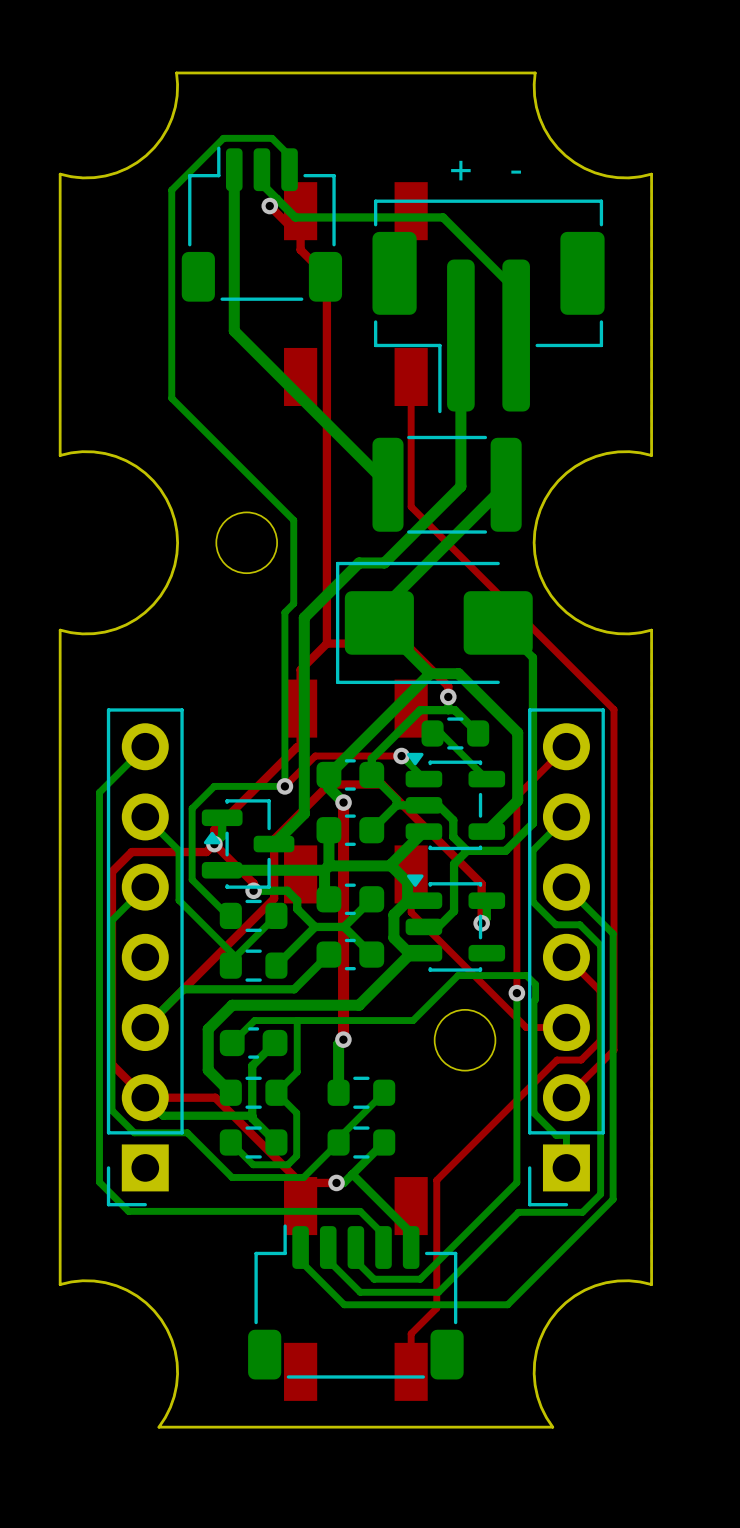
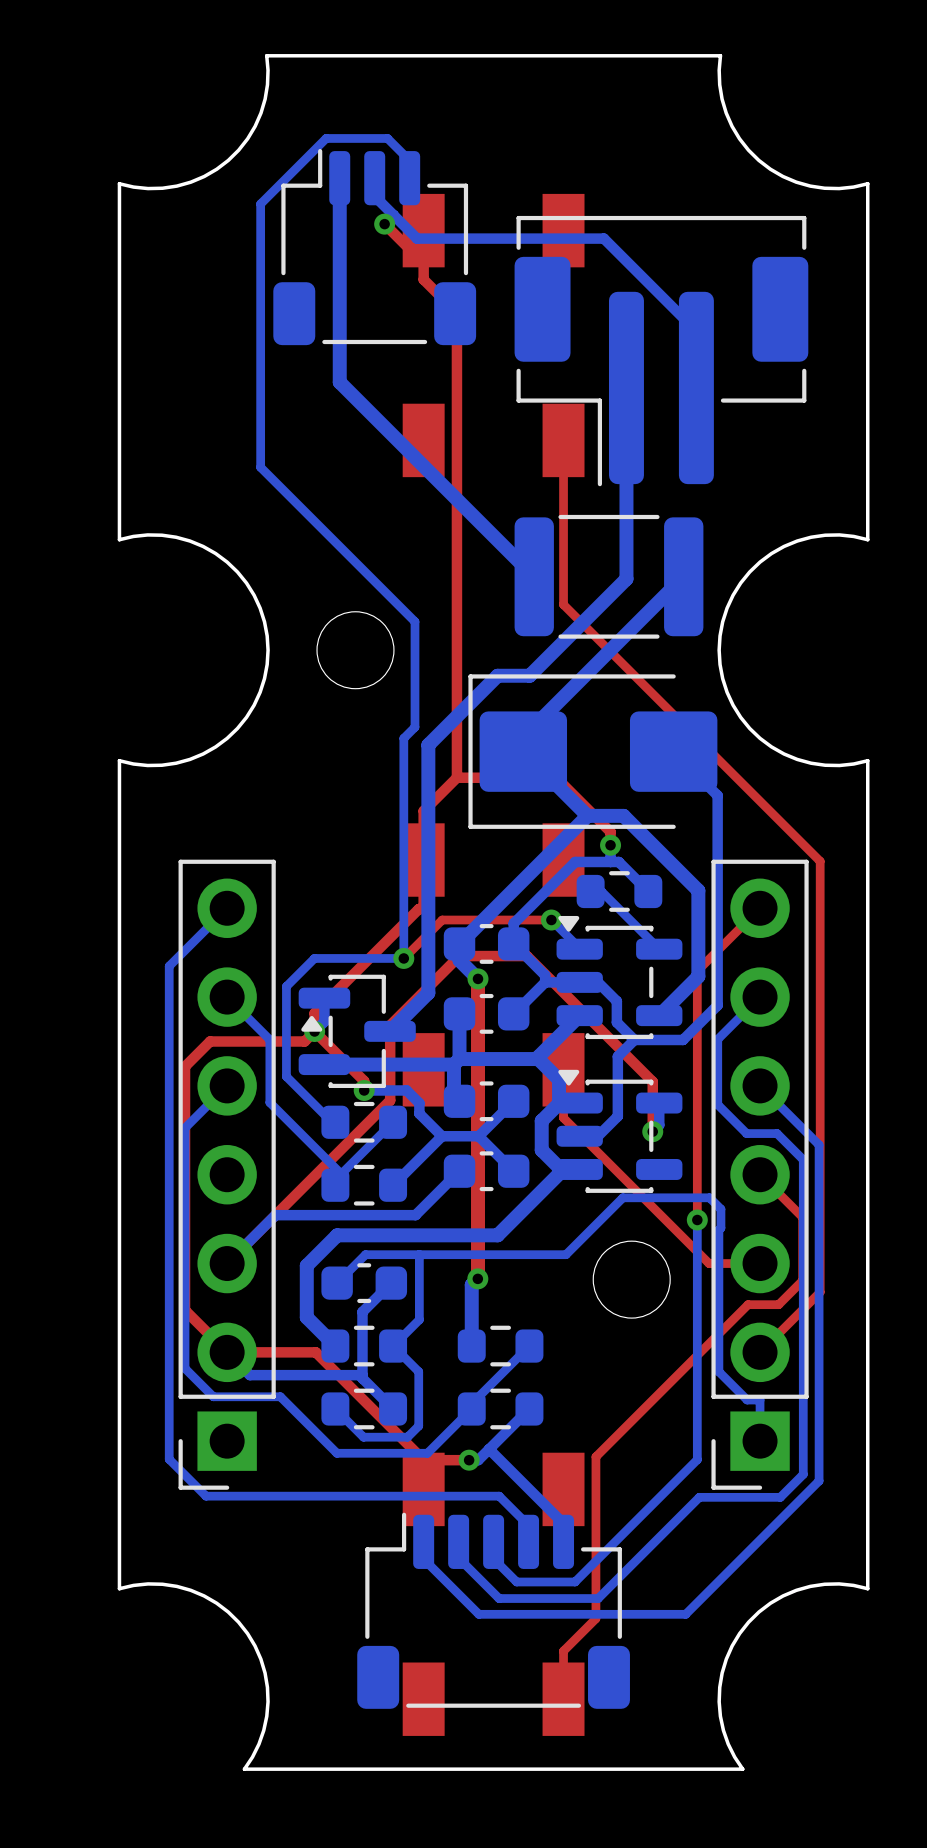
text: + (460, 170) -> none
text: - (516, 172) -> none

